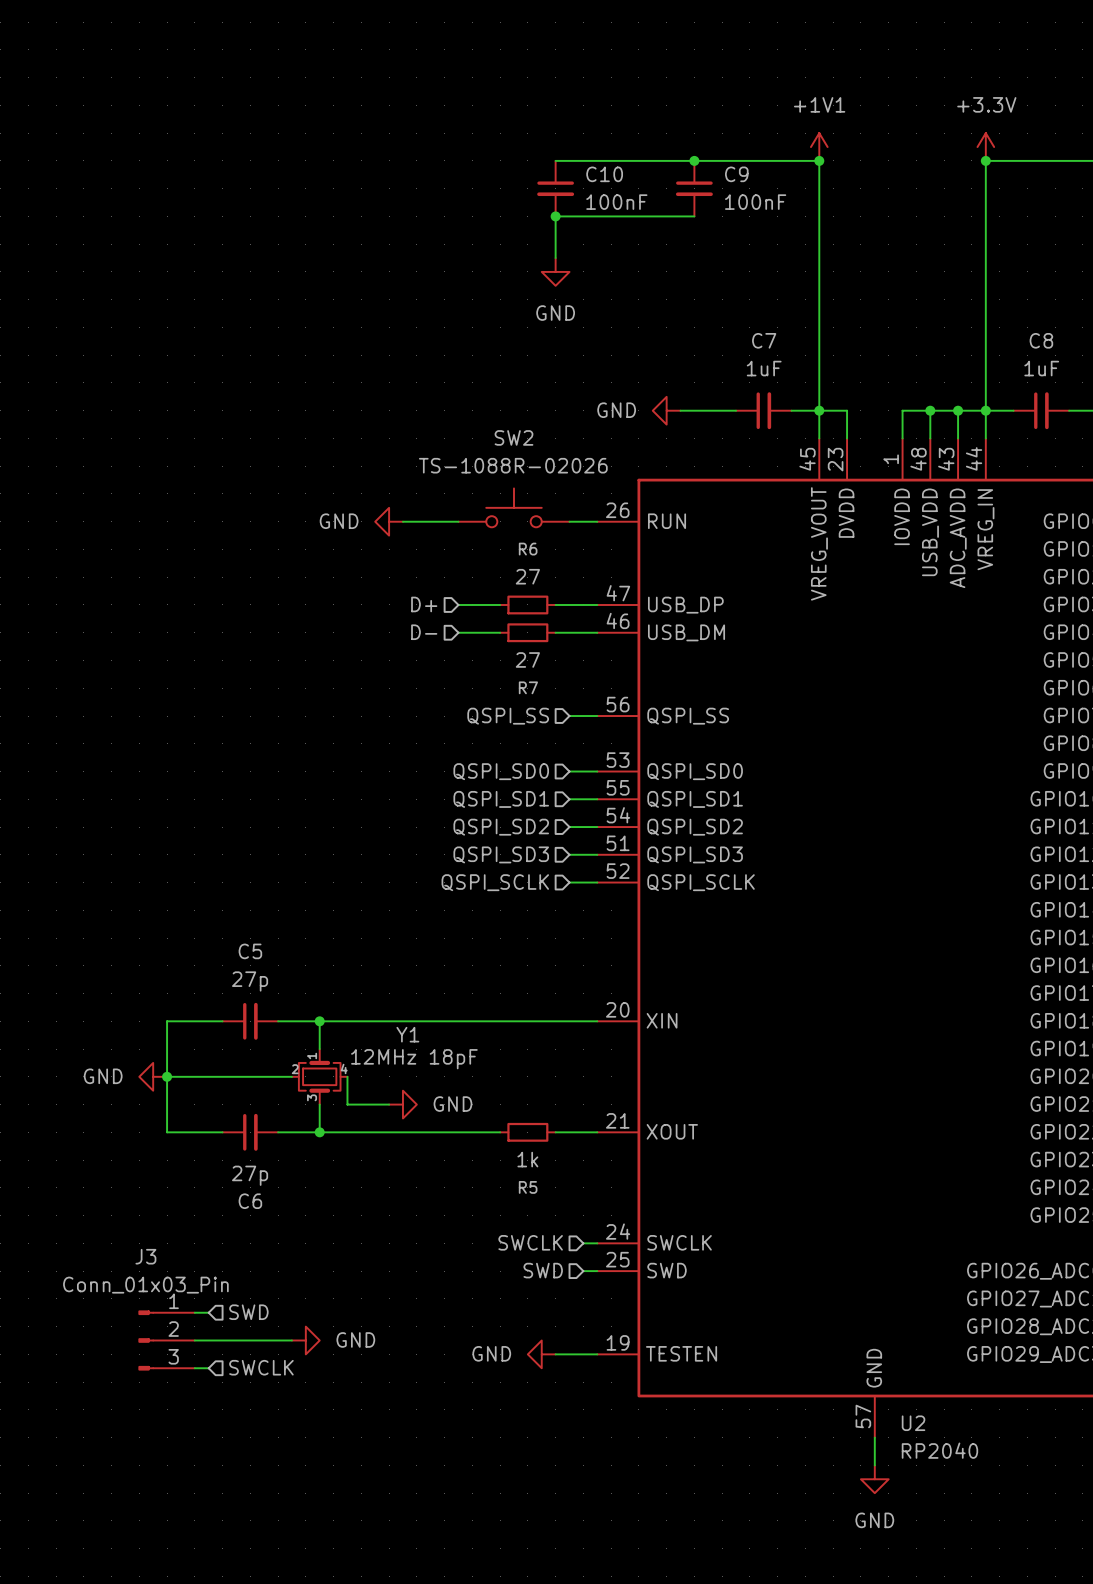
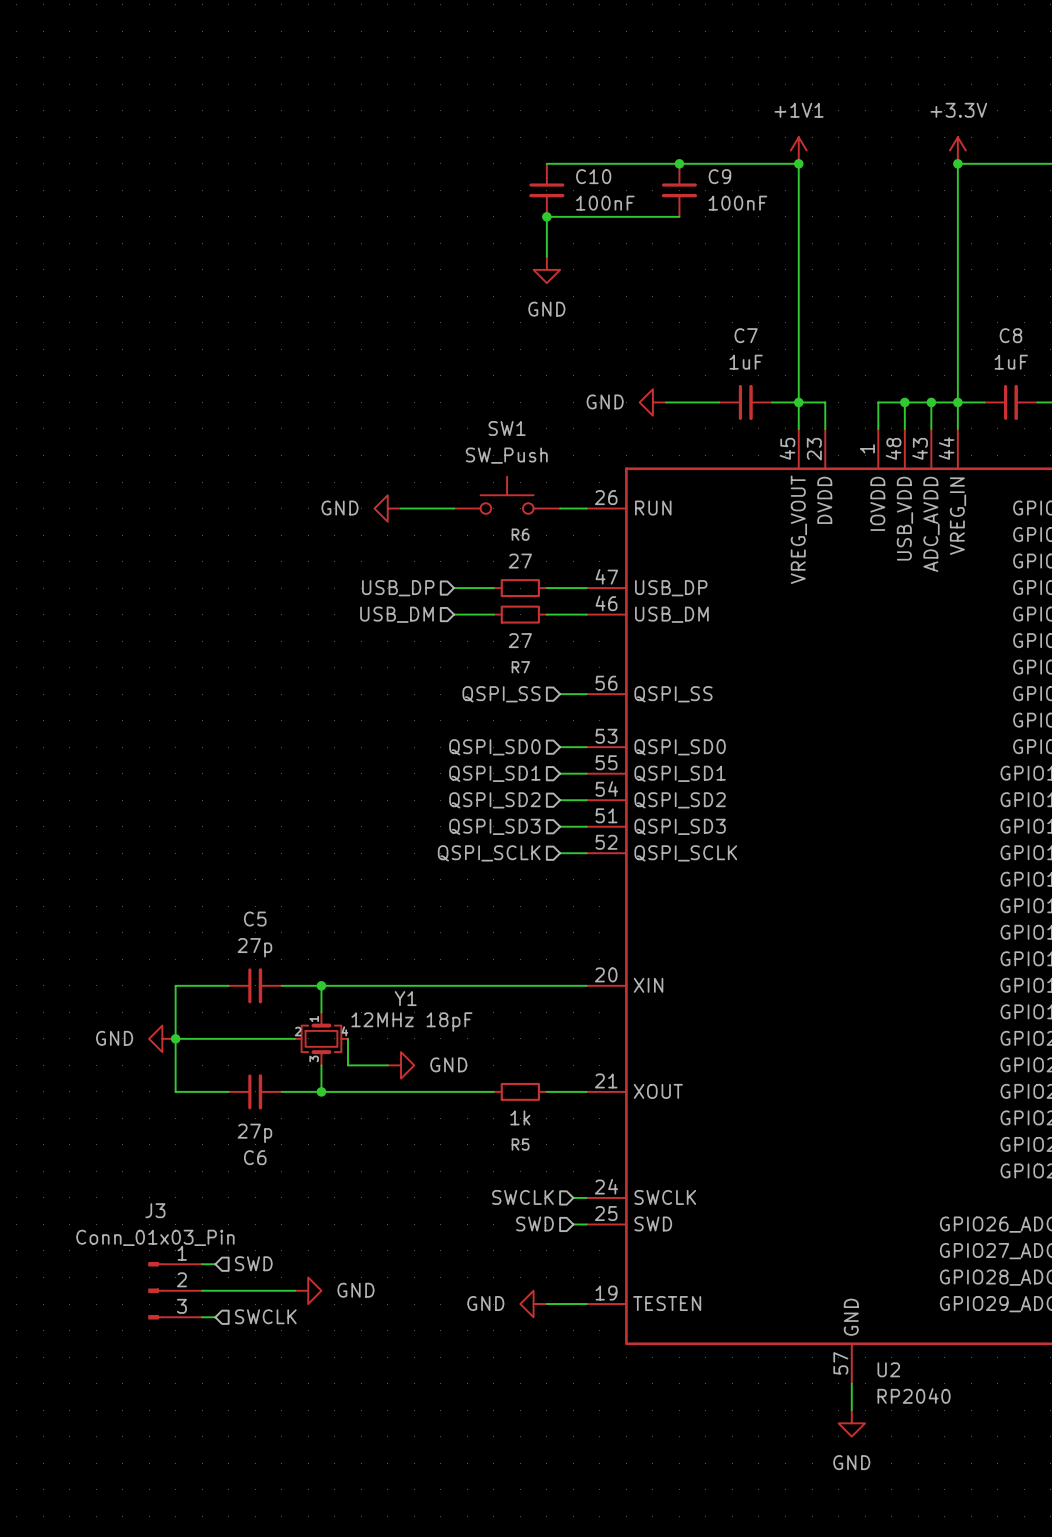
SW2 name: SW2 (513, 437) -> SW1 (507, 428)
SW2 value: TS-1088R-02026 (513, 465) -> SW_Push (506, 455)
hierarchical label: D+ (424, 604) -> USB_DP (398, 588)
hierarchical label: D- (424, 632) -> USB_DM (397, 614)

